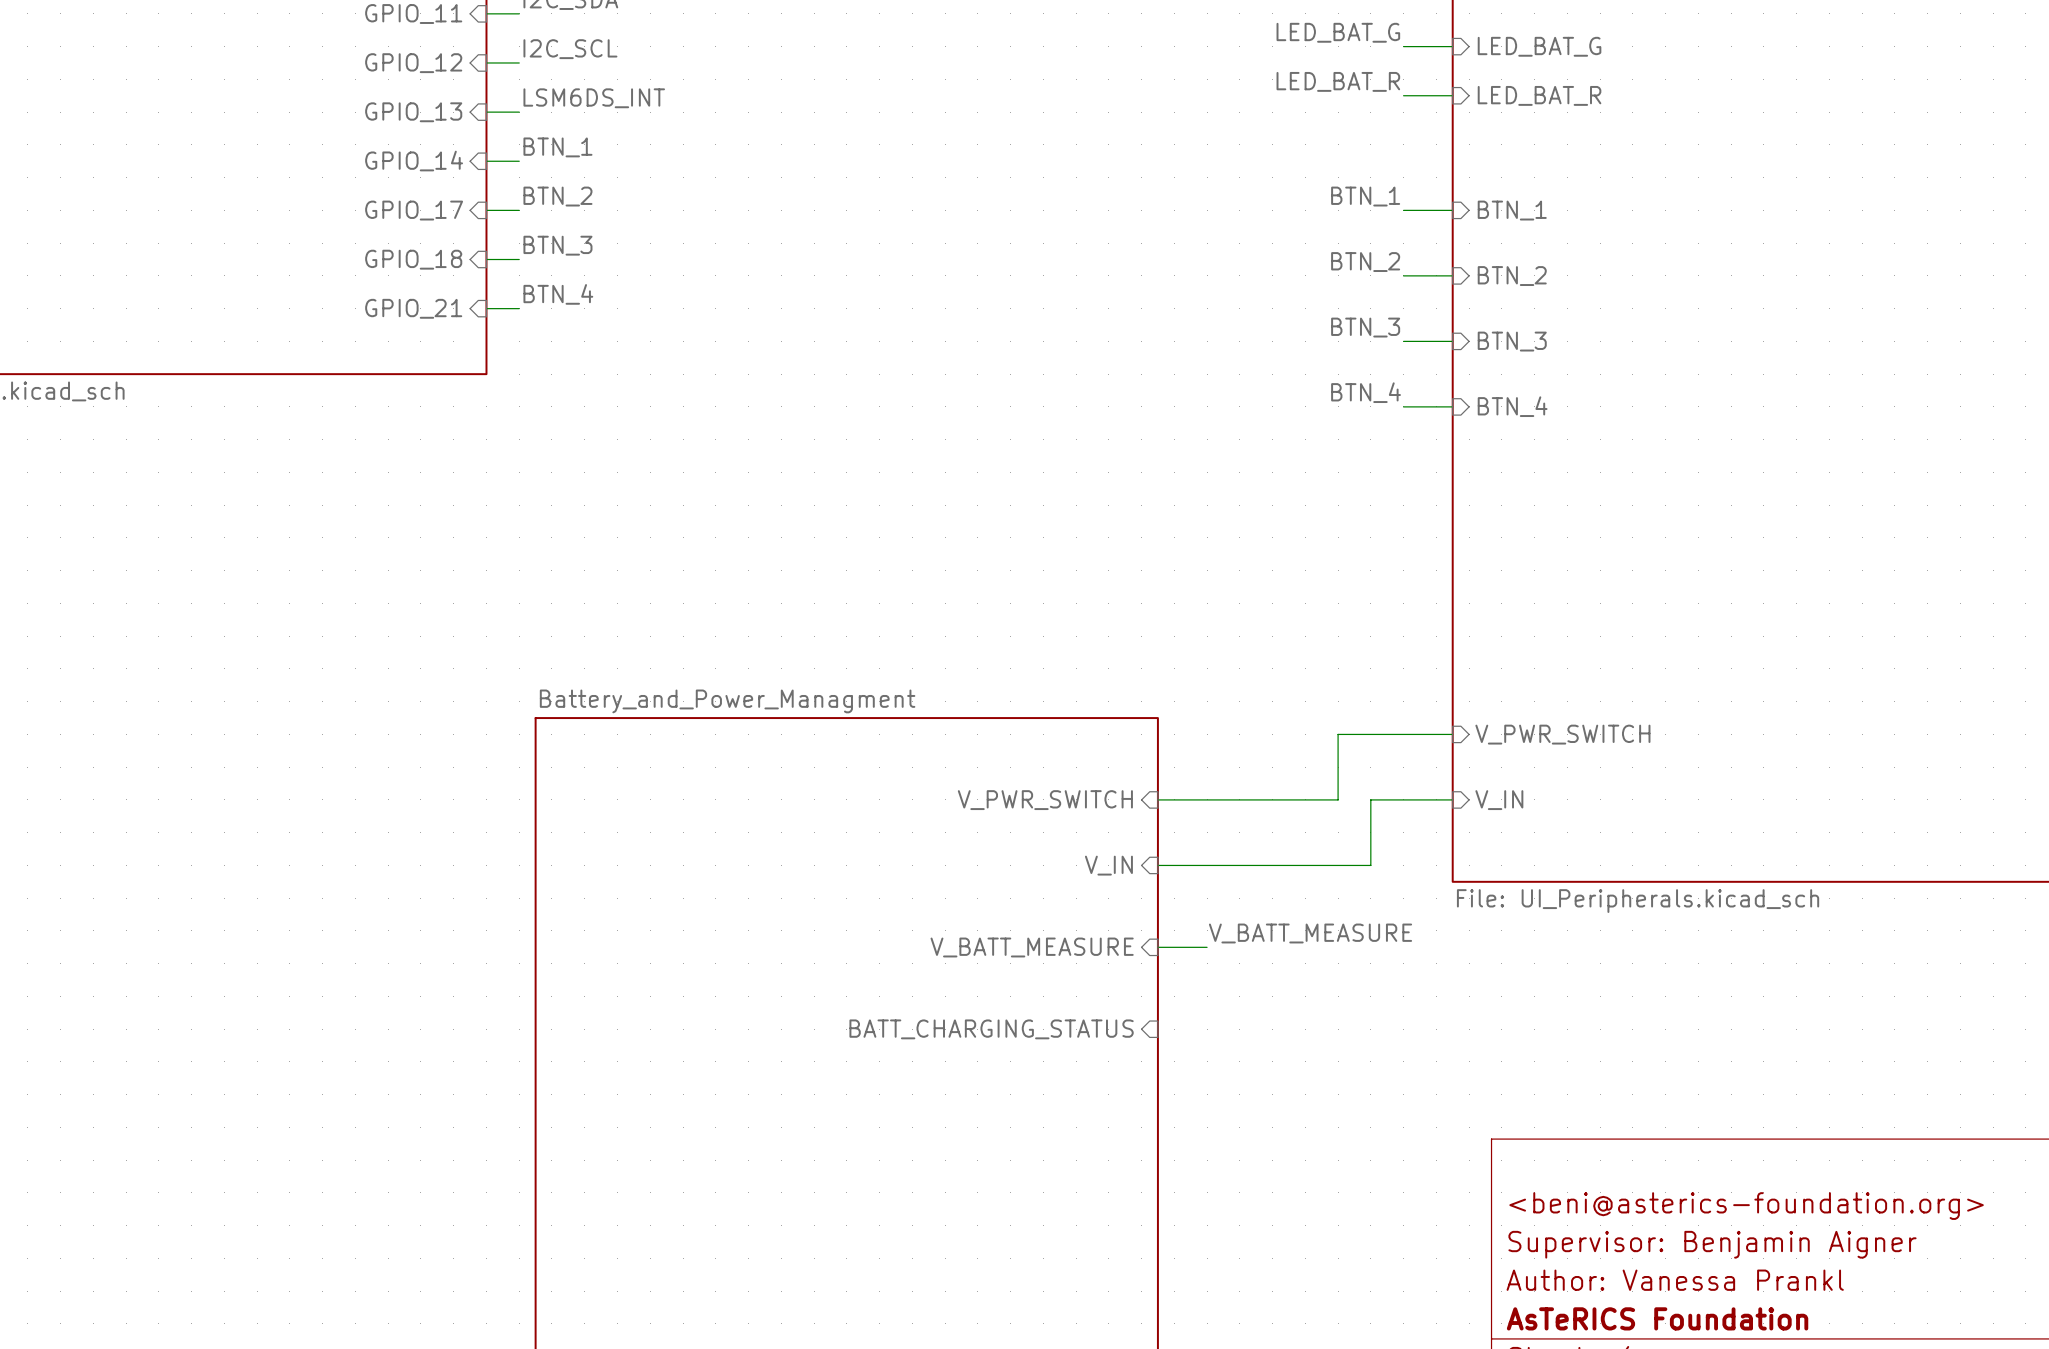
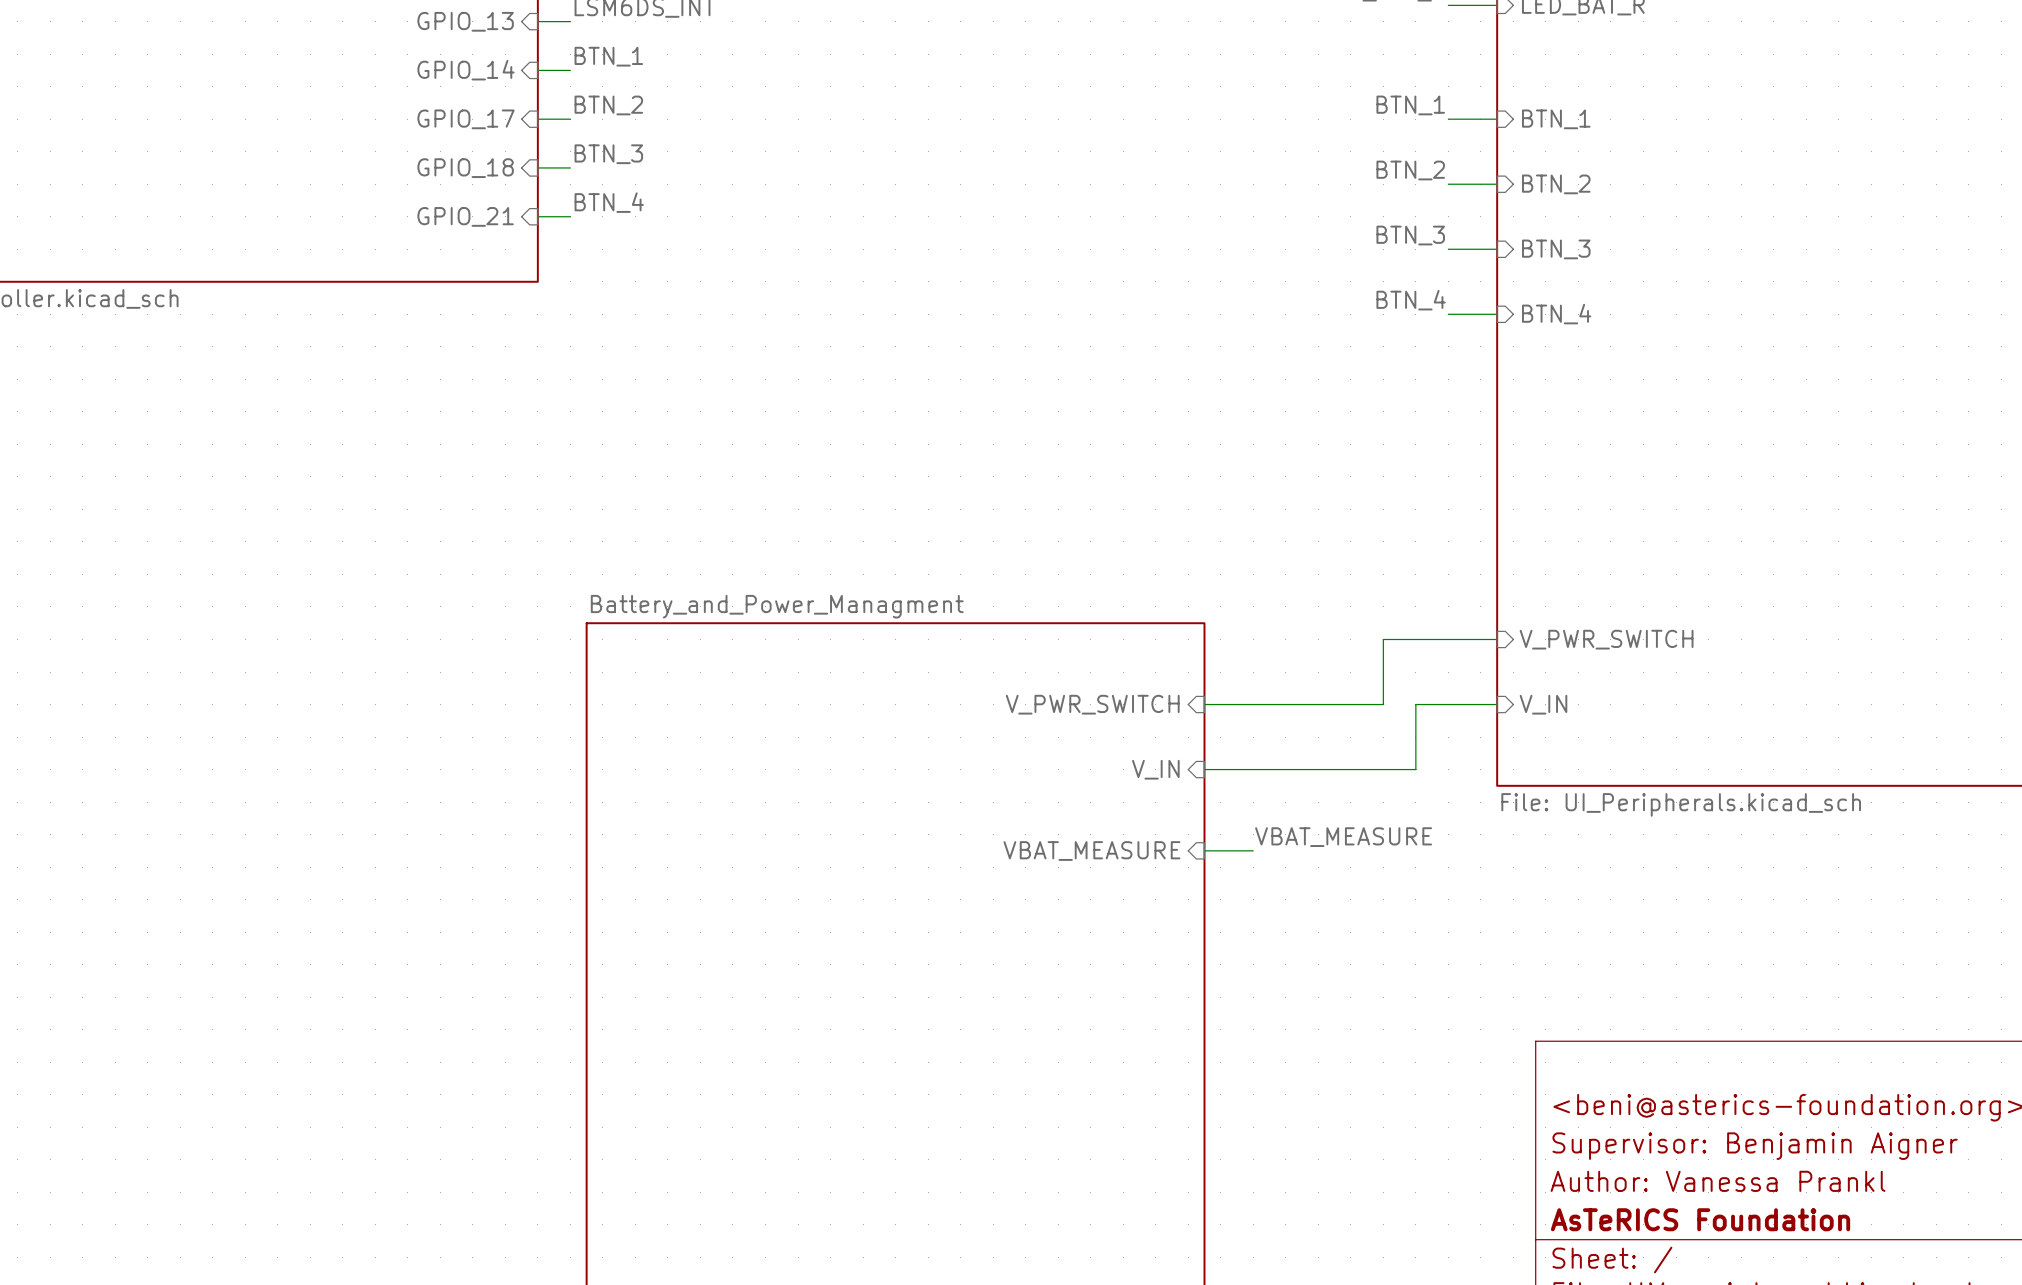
label: V_BATT_MEASURE (1310, 933) -> VBAT_MEASURE (1343, 837)
sheet pin: V_BATT_MEASURE (1032, 947) -> VBAT_MEASURE (1091, 851)
sheet pin: BATT_CHARGING_STATUS (991, 1029) -> none

